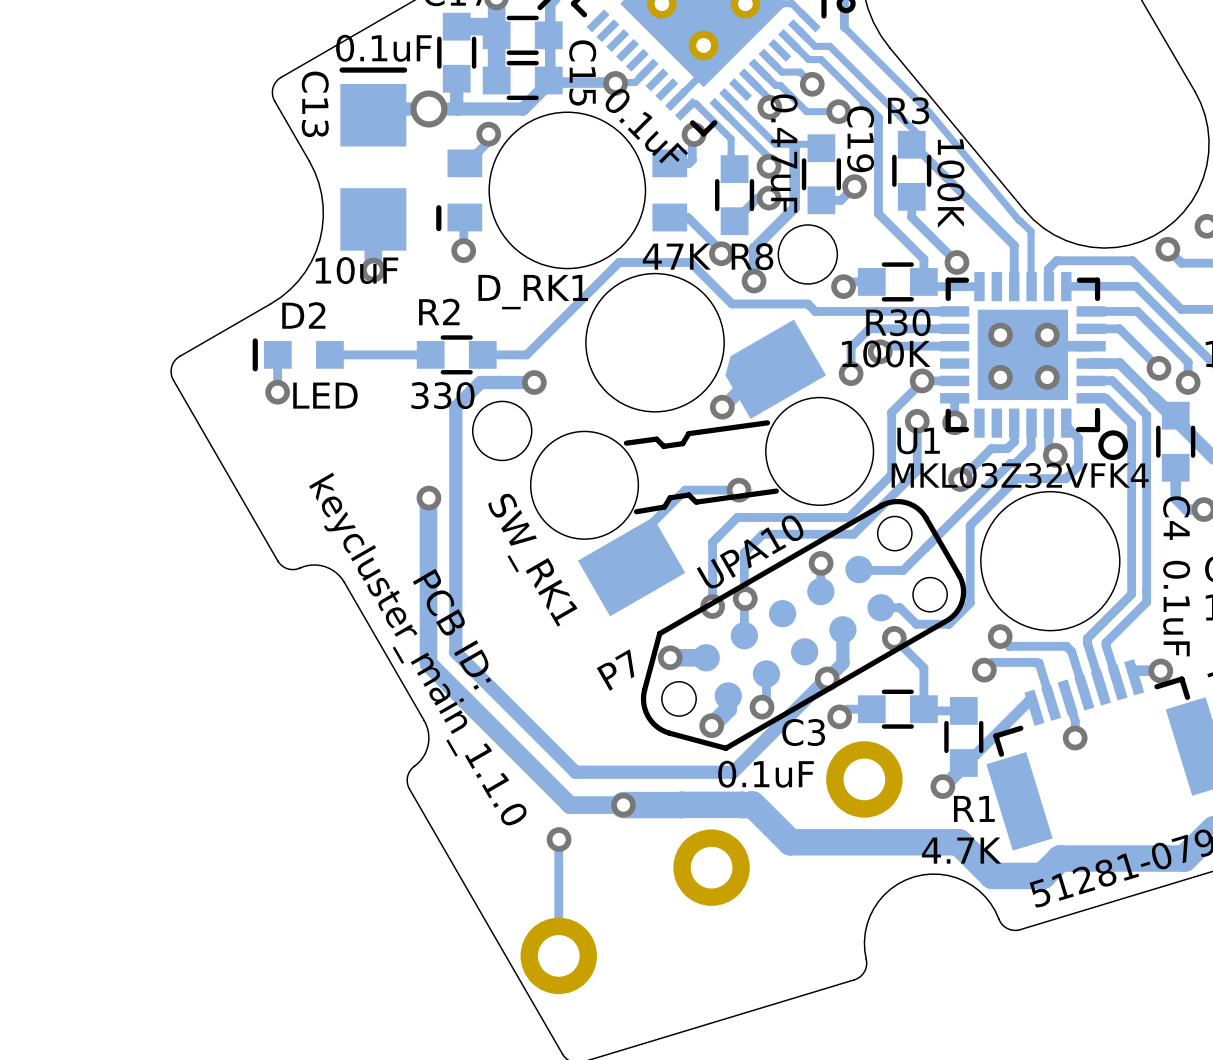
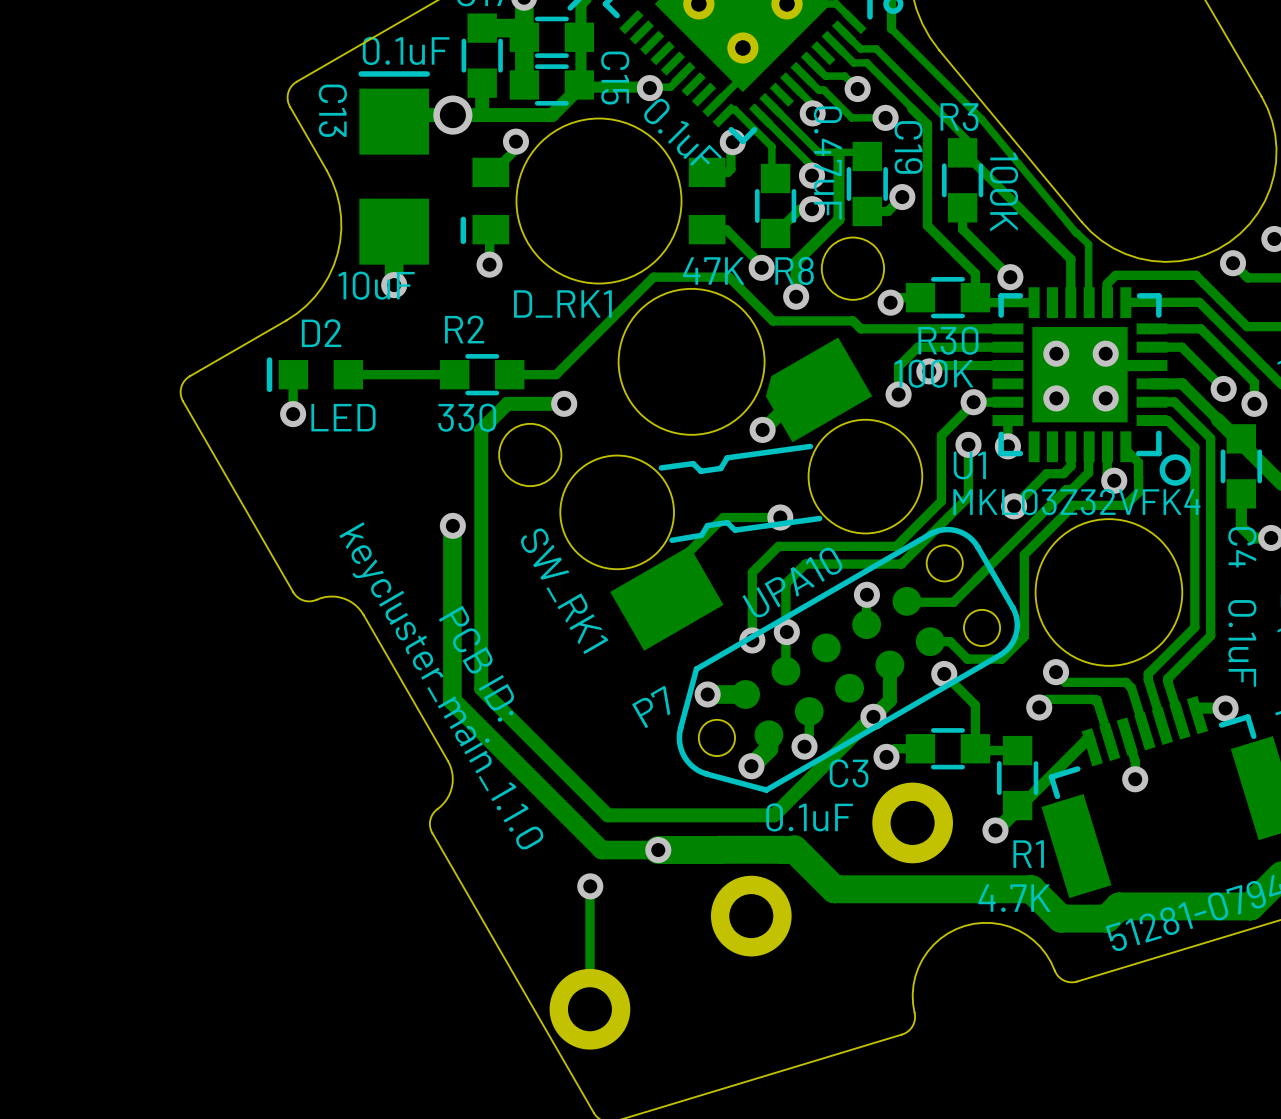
track: (958, 842) (992, 875) (1042, 875) (1048, 870) -> (1012, 889) (1031, 889) (1060, 918) (1107, 918)

